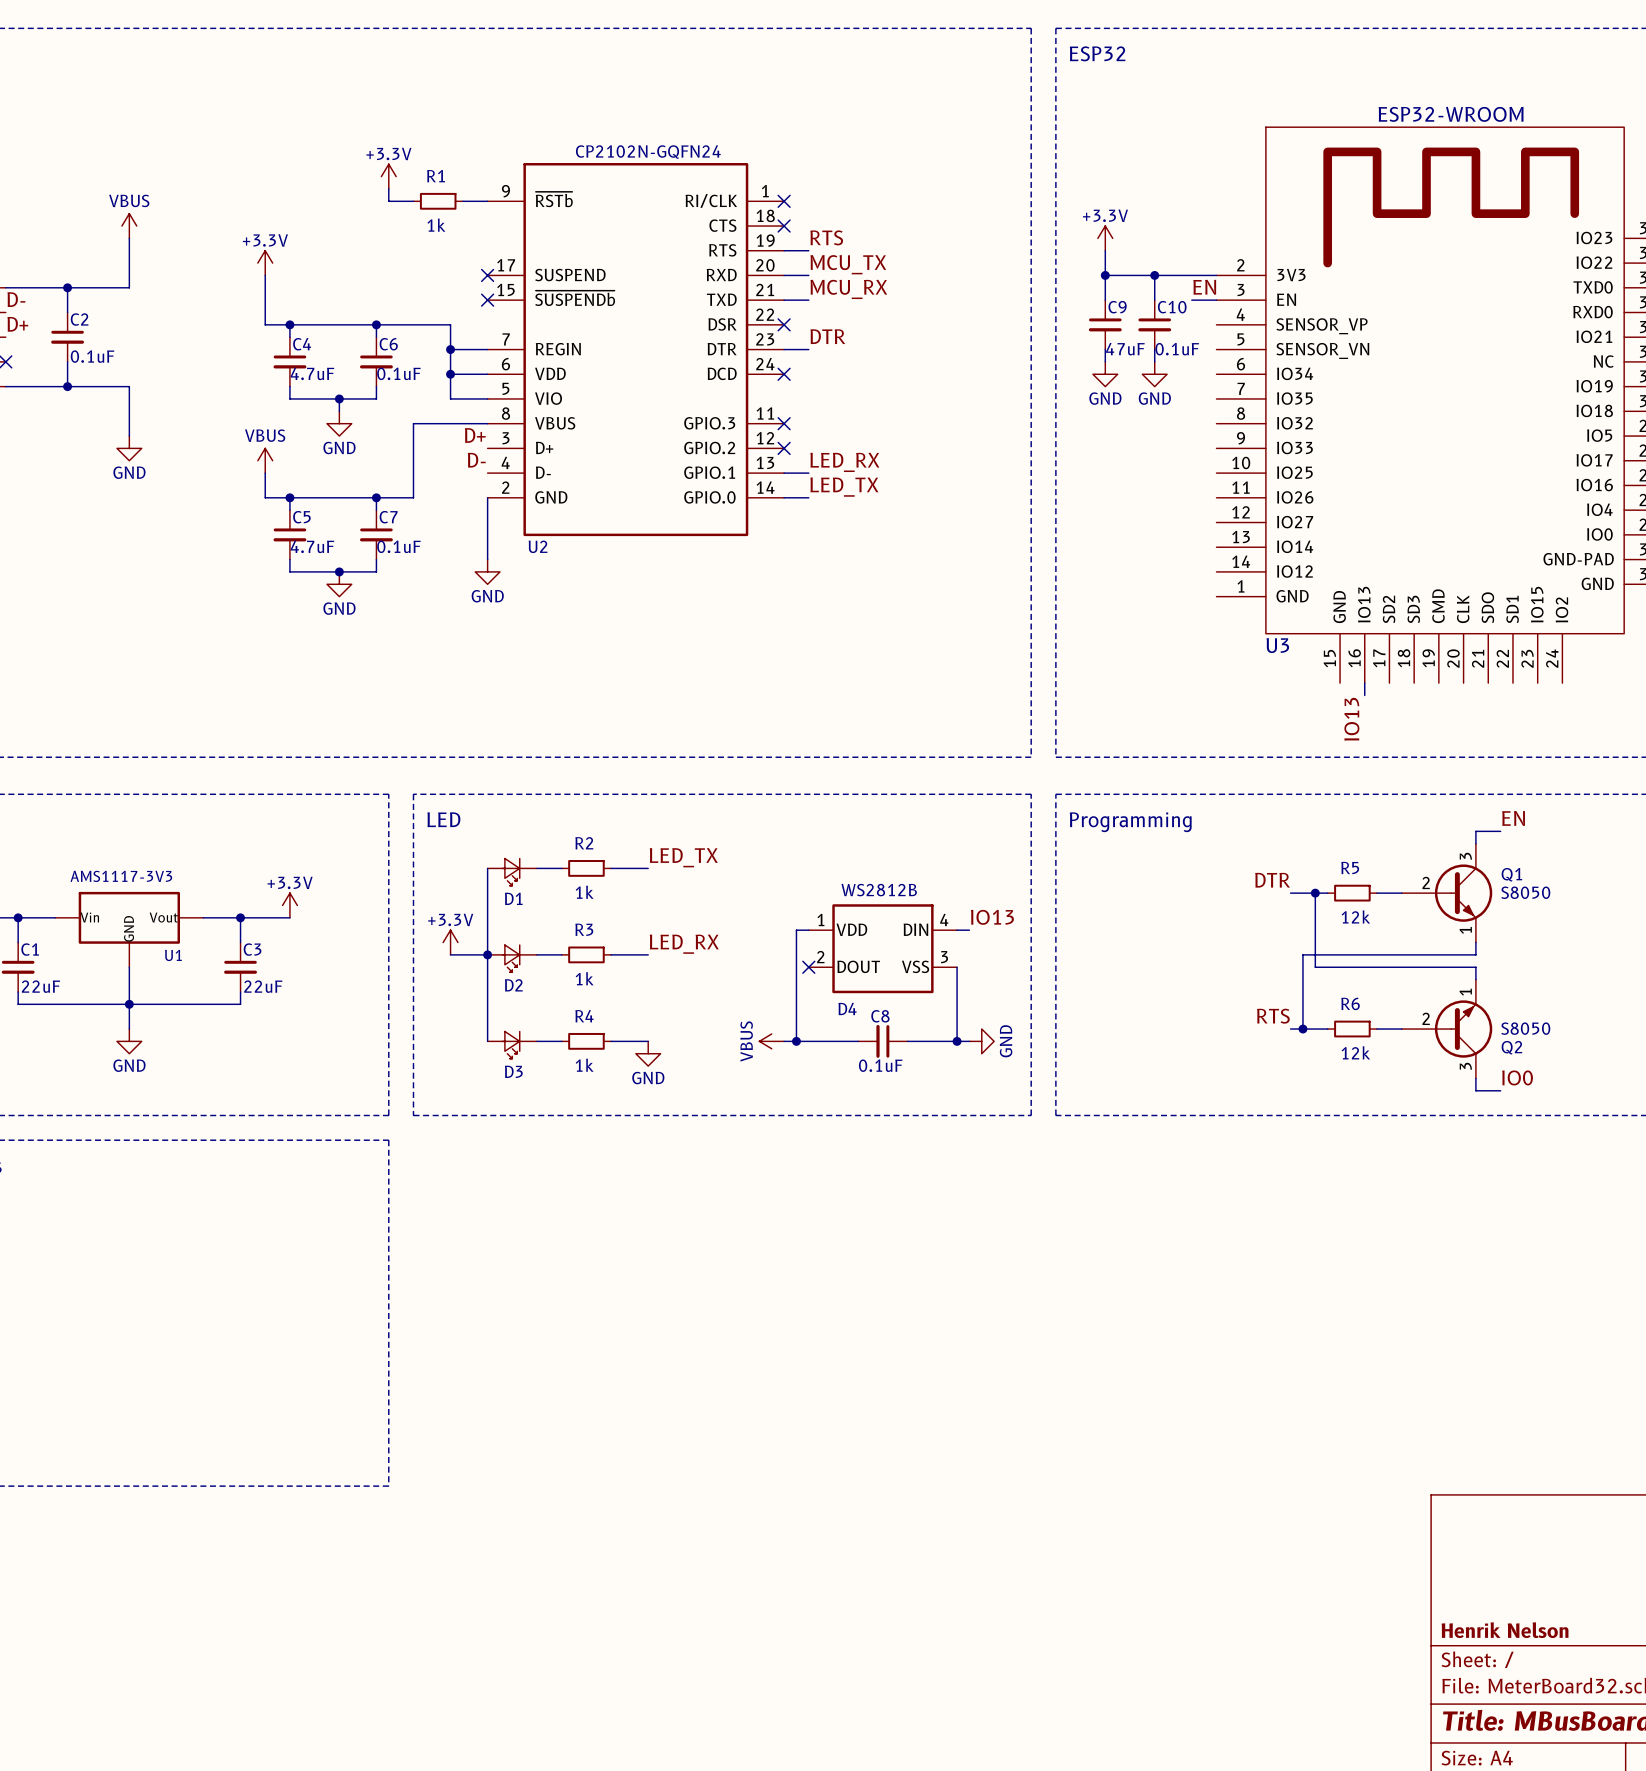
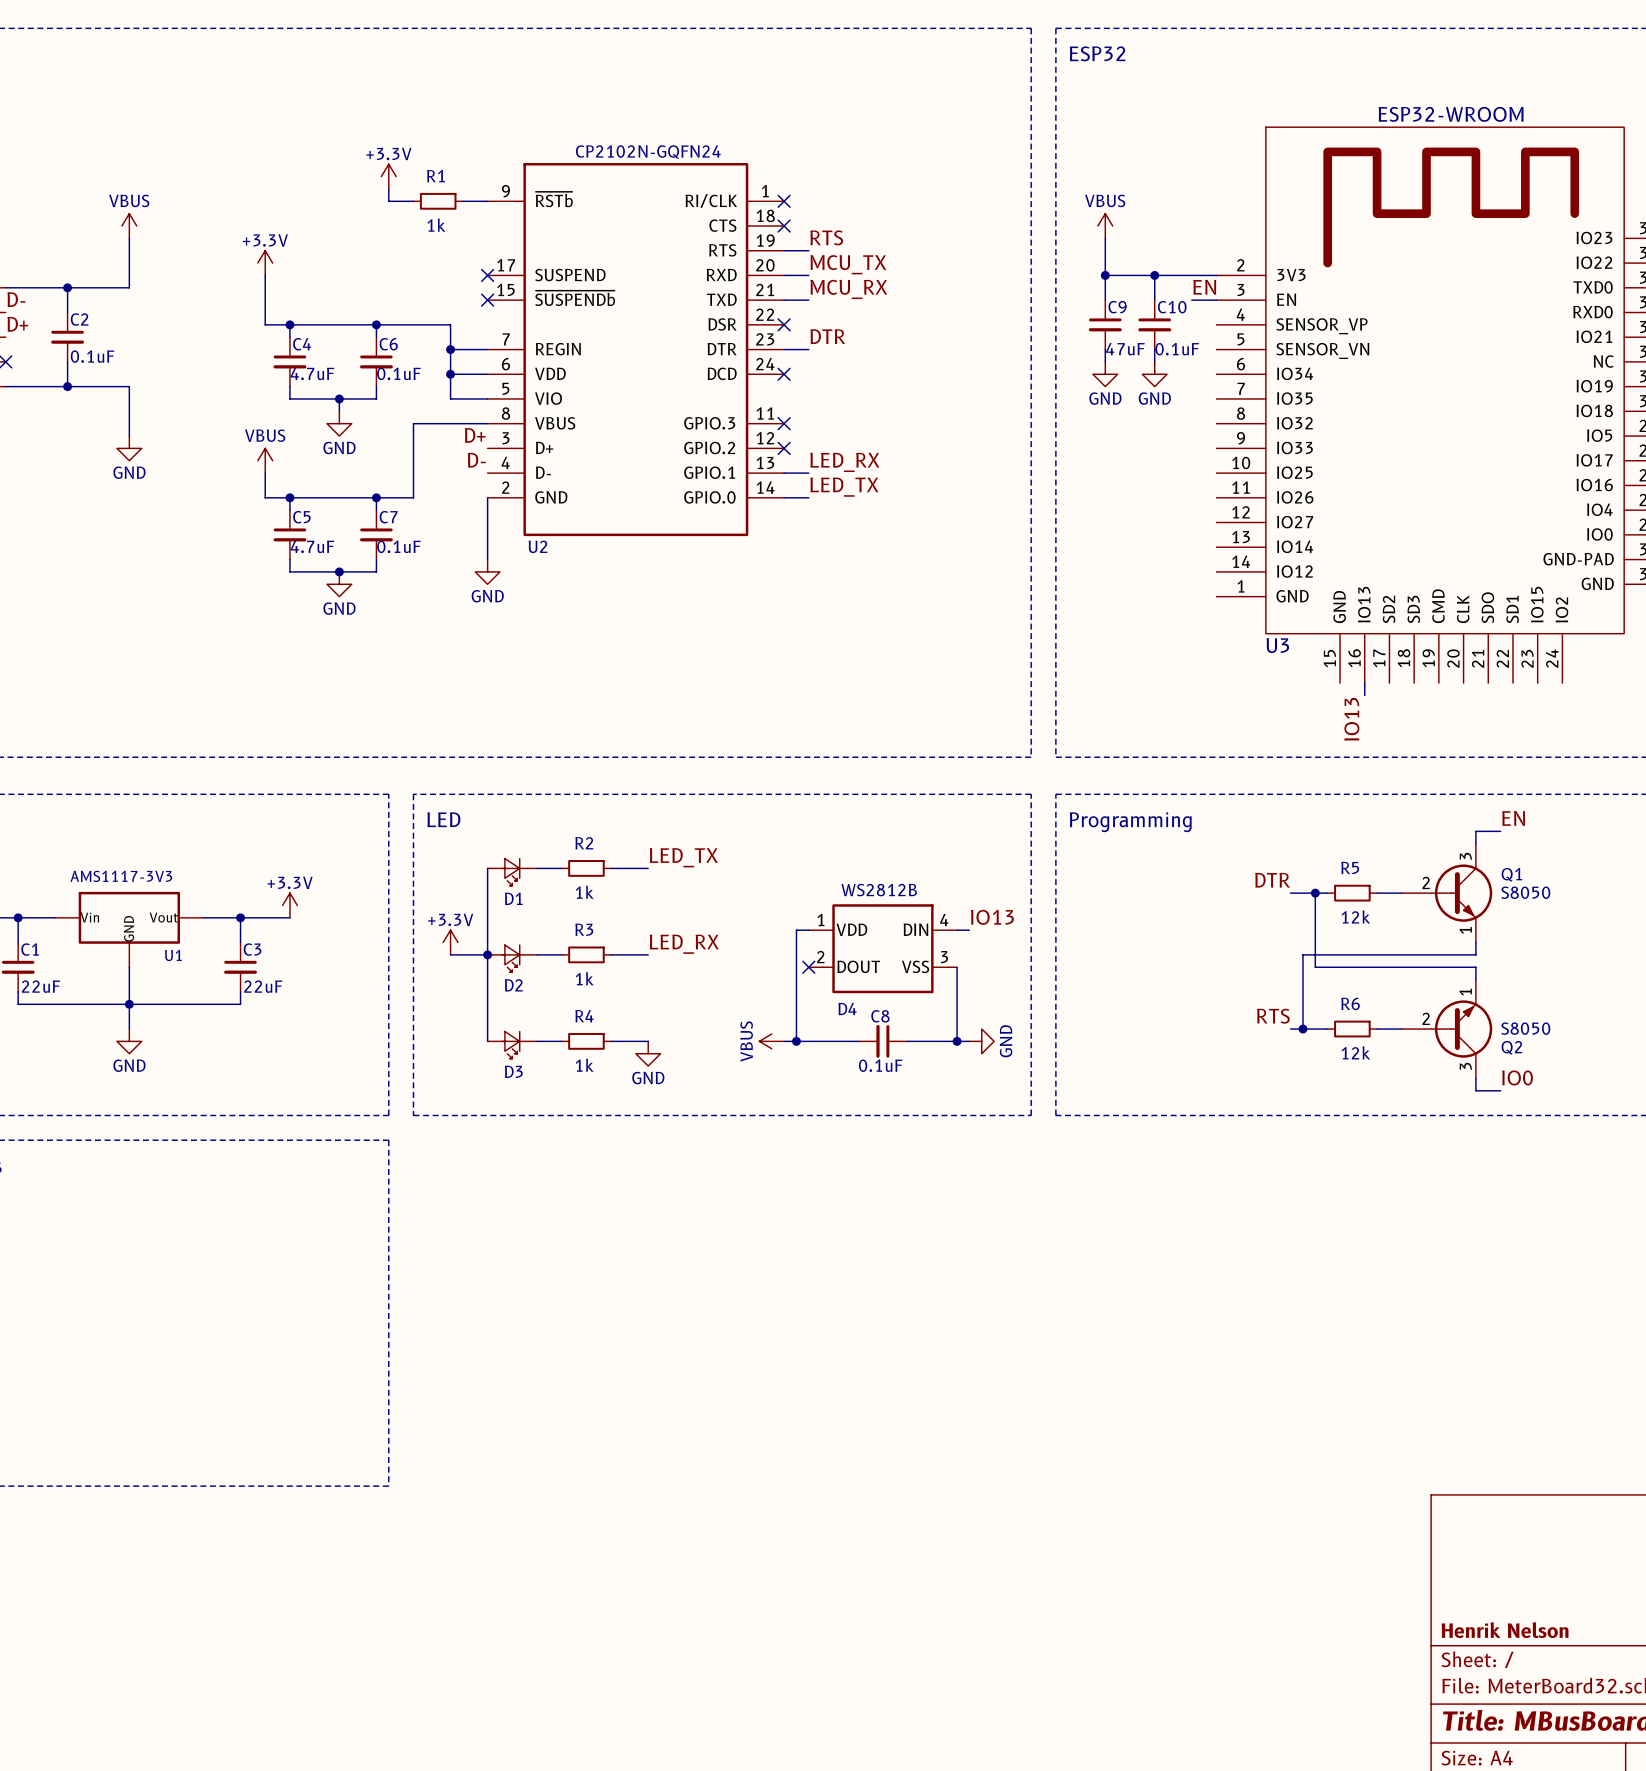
power symbol: none -> VBUS (1105, 226)
power symbol: +3.3V (1105, 238) -> none

